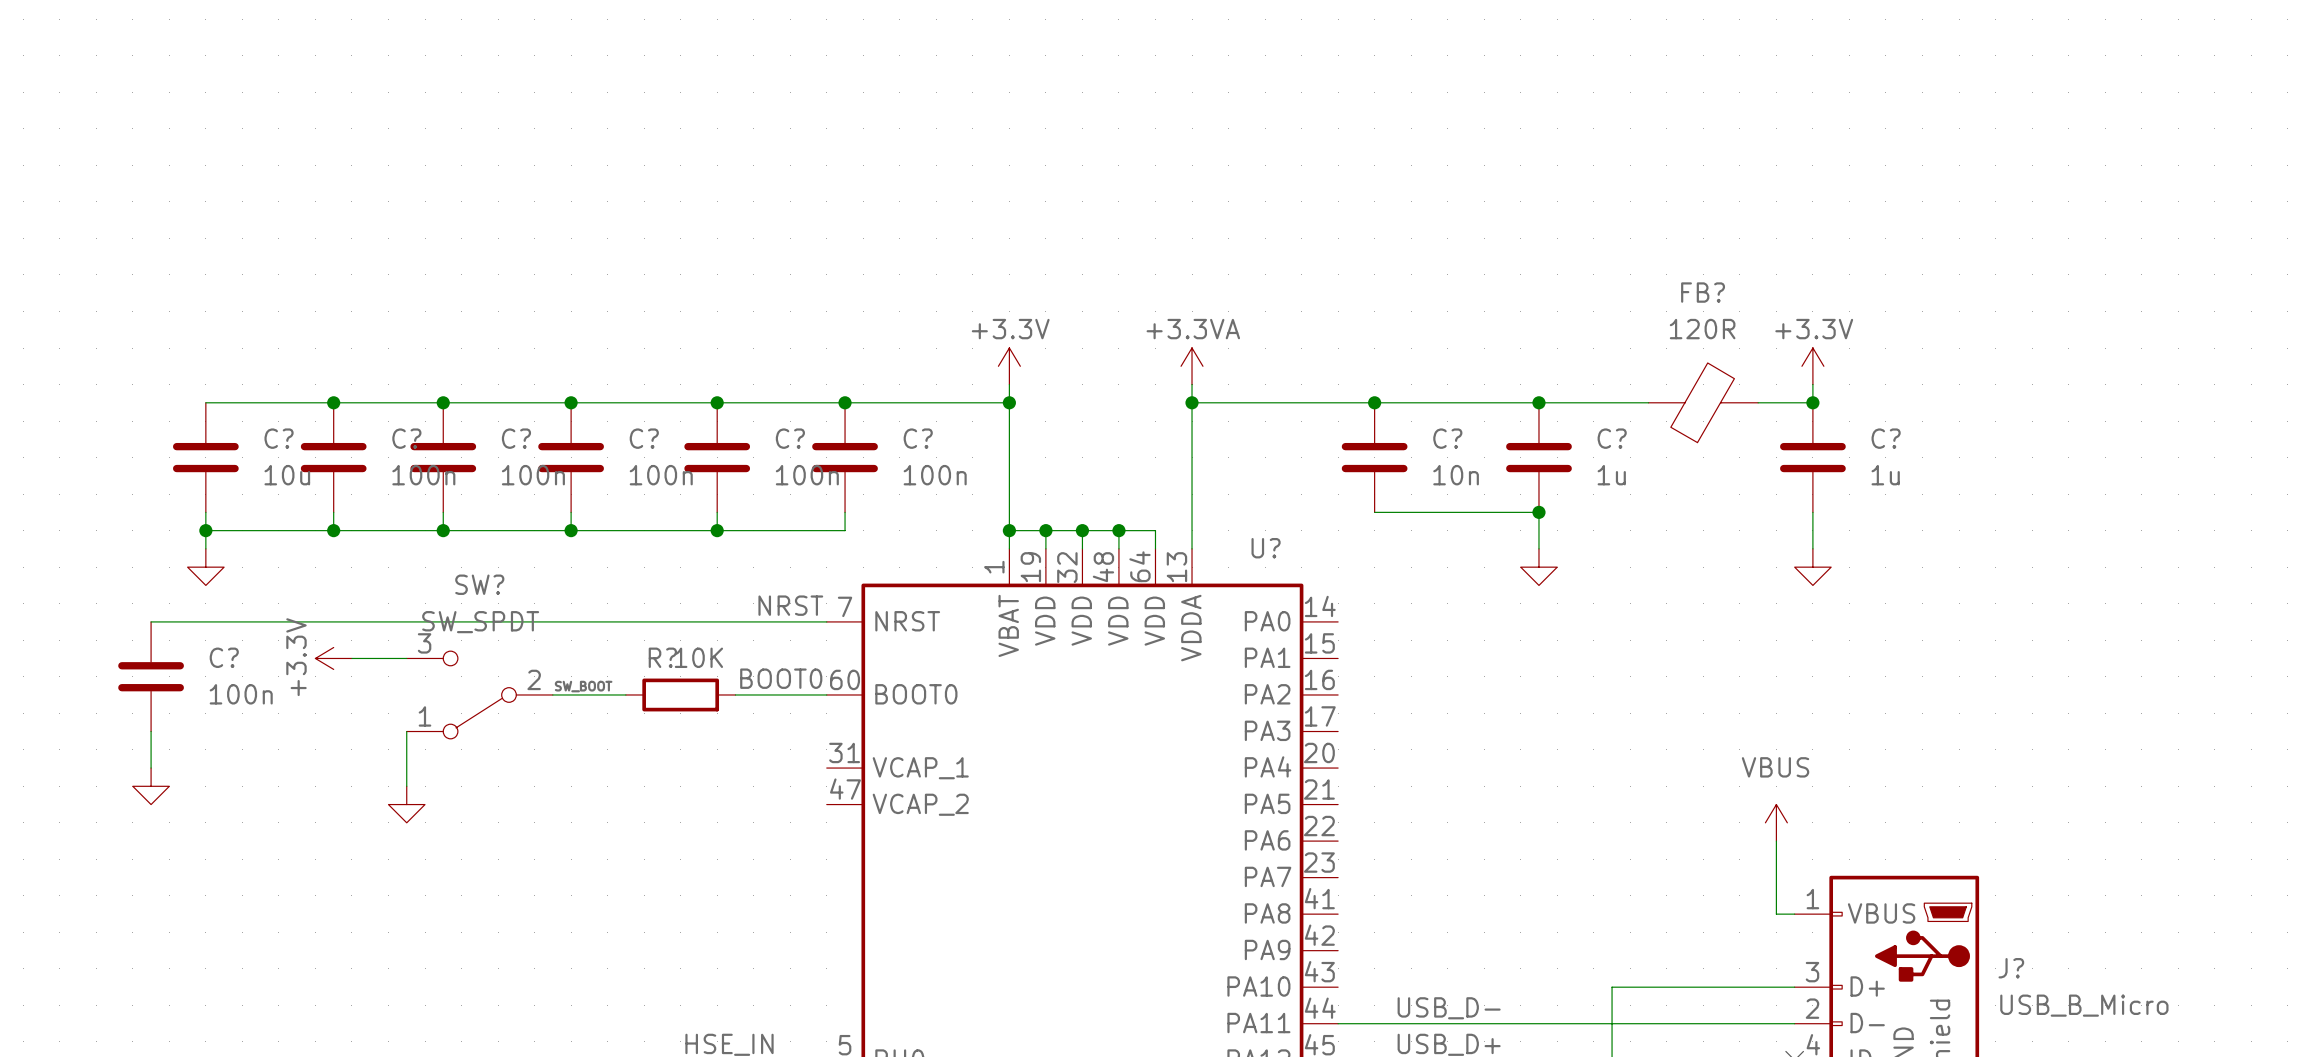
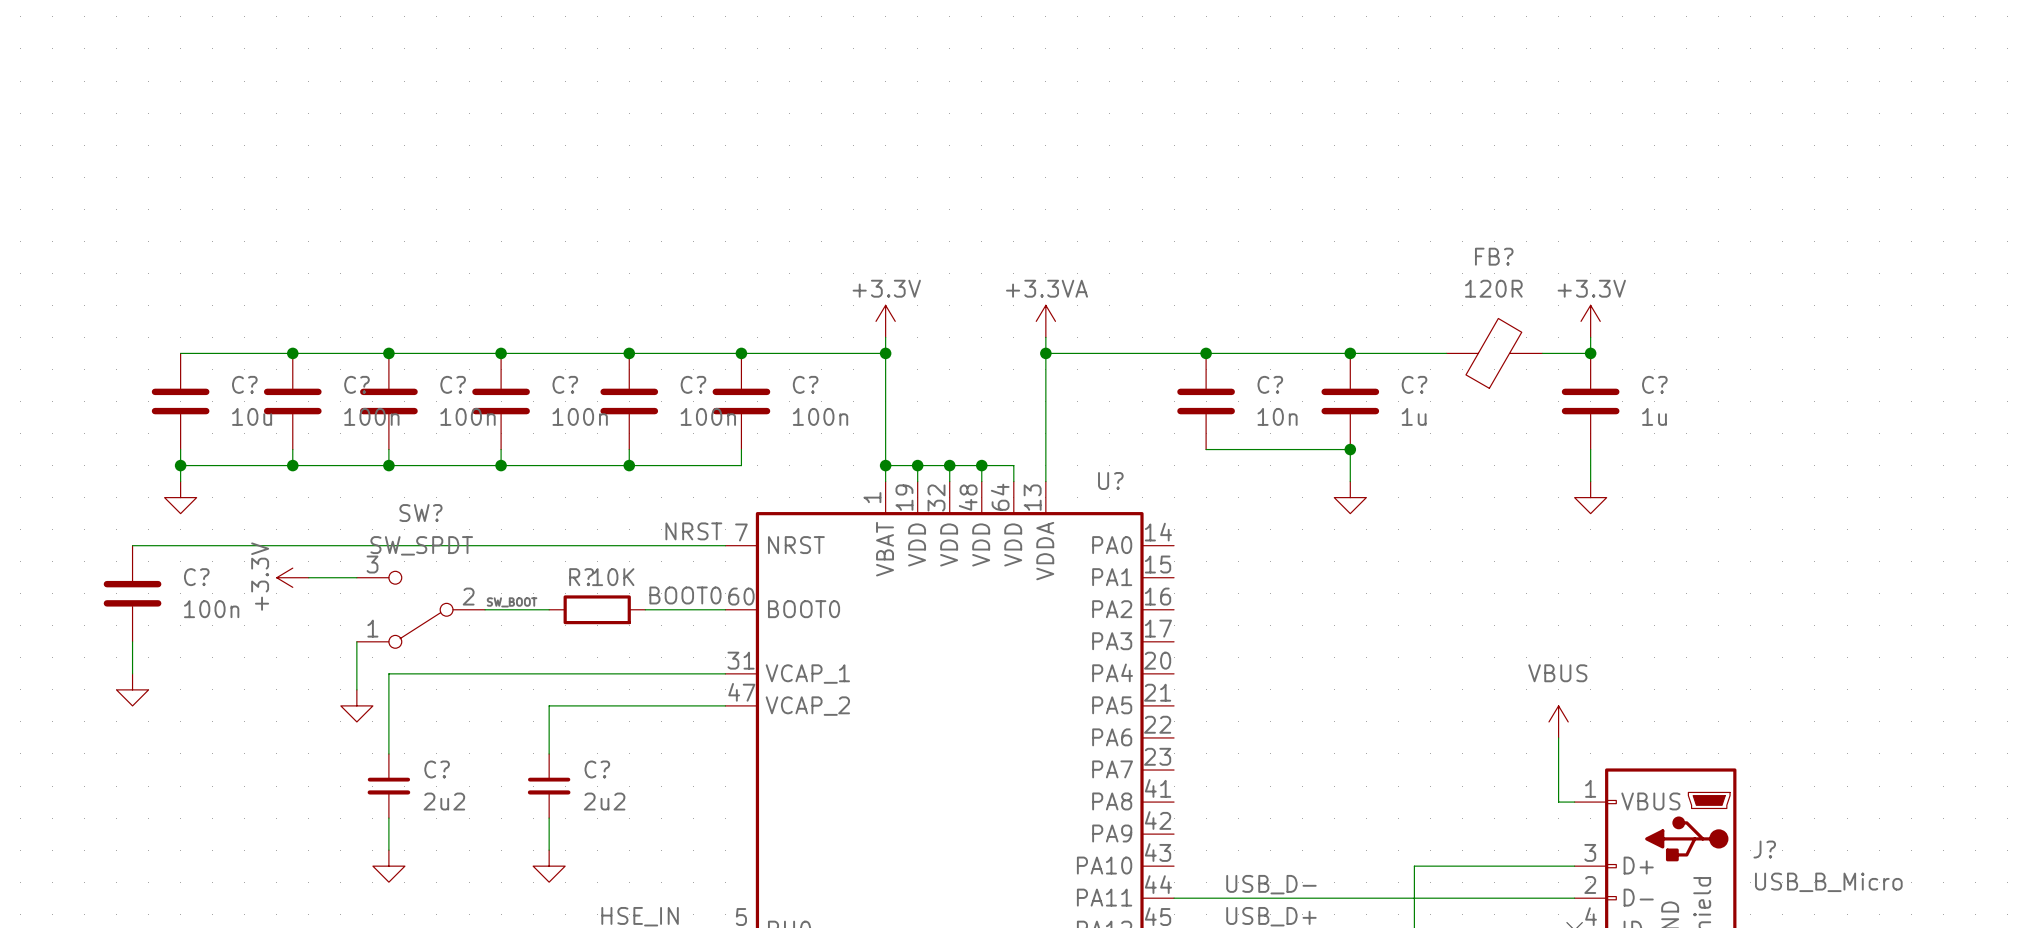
wire: none -> (725, 673) (388, 673) (388, 753)
wire: none -> (725, 705) (549, 705) (549, 753)
C?: none -> 2u2 (388, 786)
C?: none -> 2u2 (549, 786)
wire: none -> (388, 818) (388, 850)
wire: none -> (549, 818) (549, 850)
power symbol: none -> (388, 866)
power symbol: none -> (549, 866)

